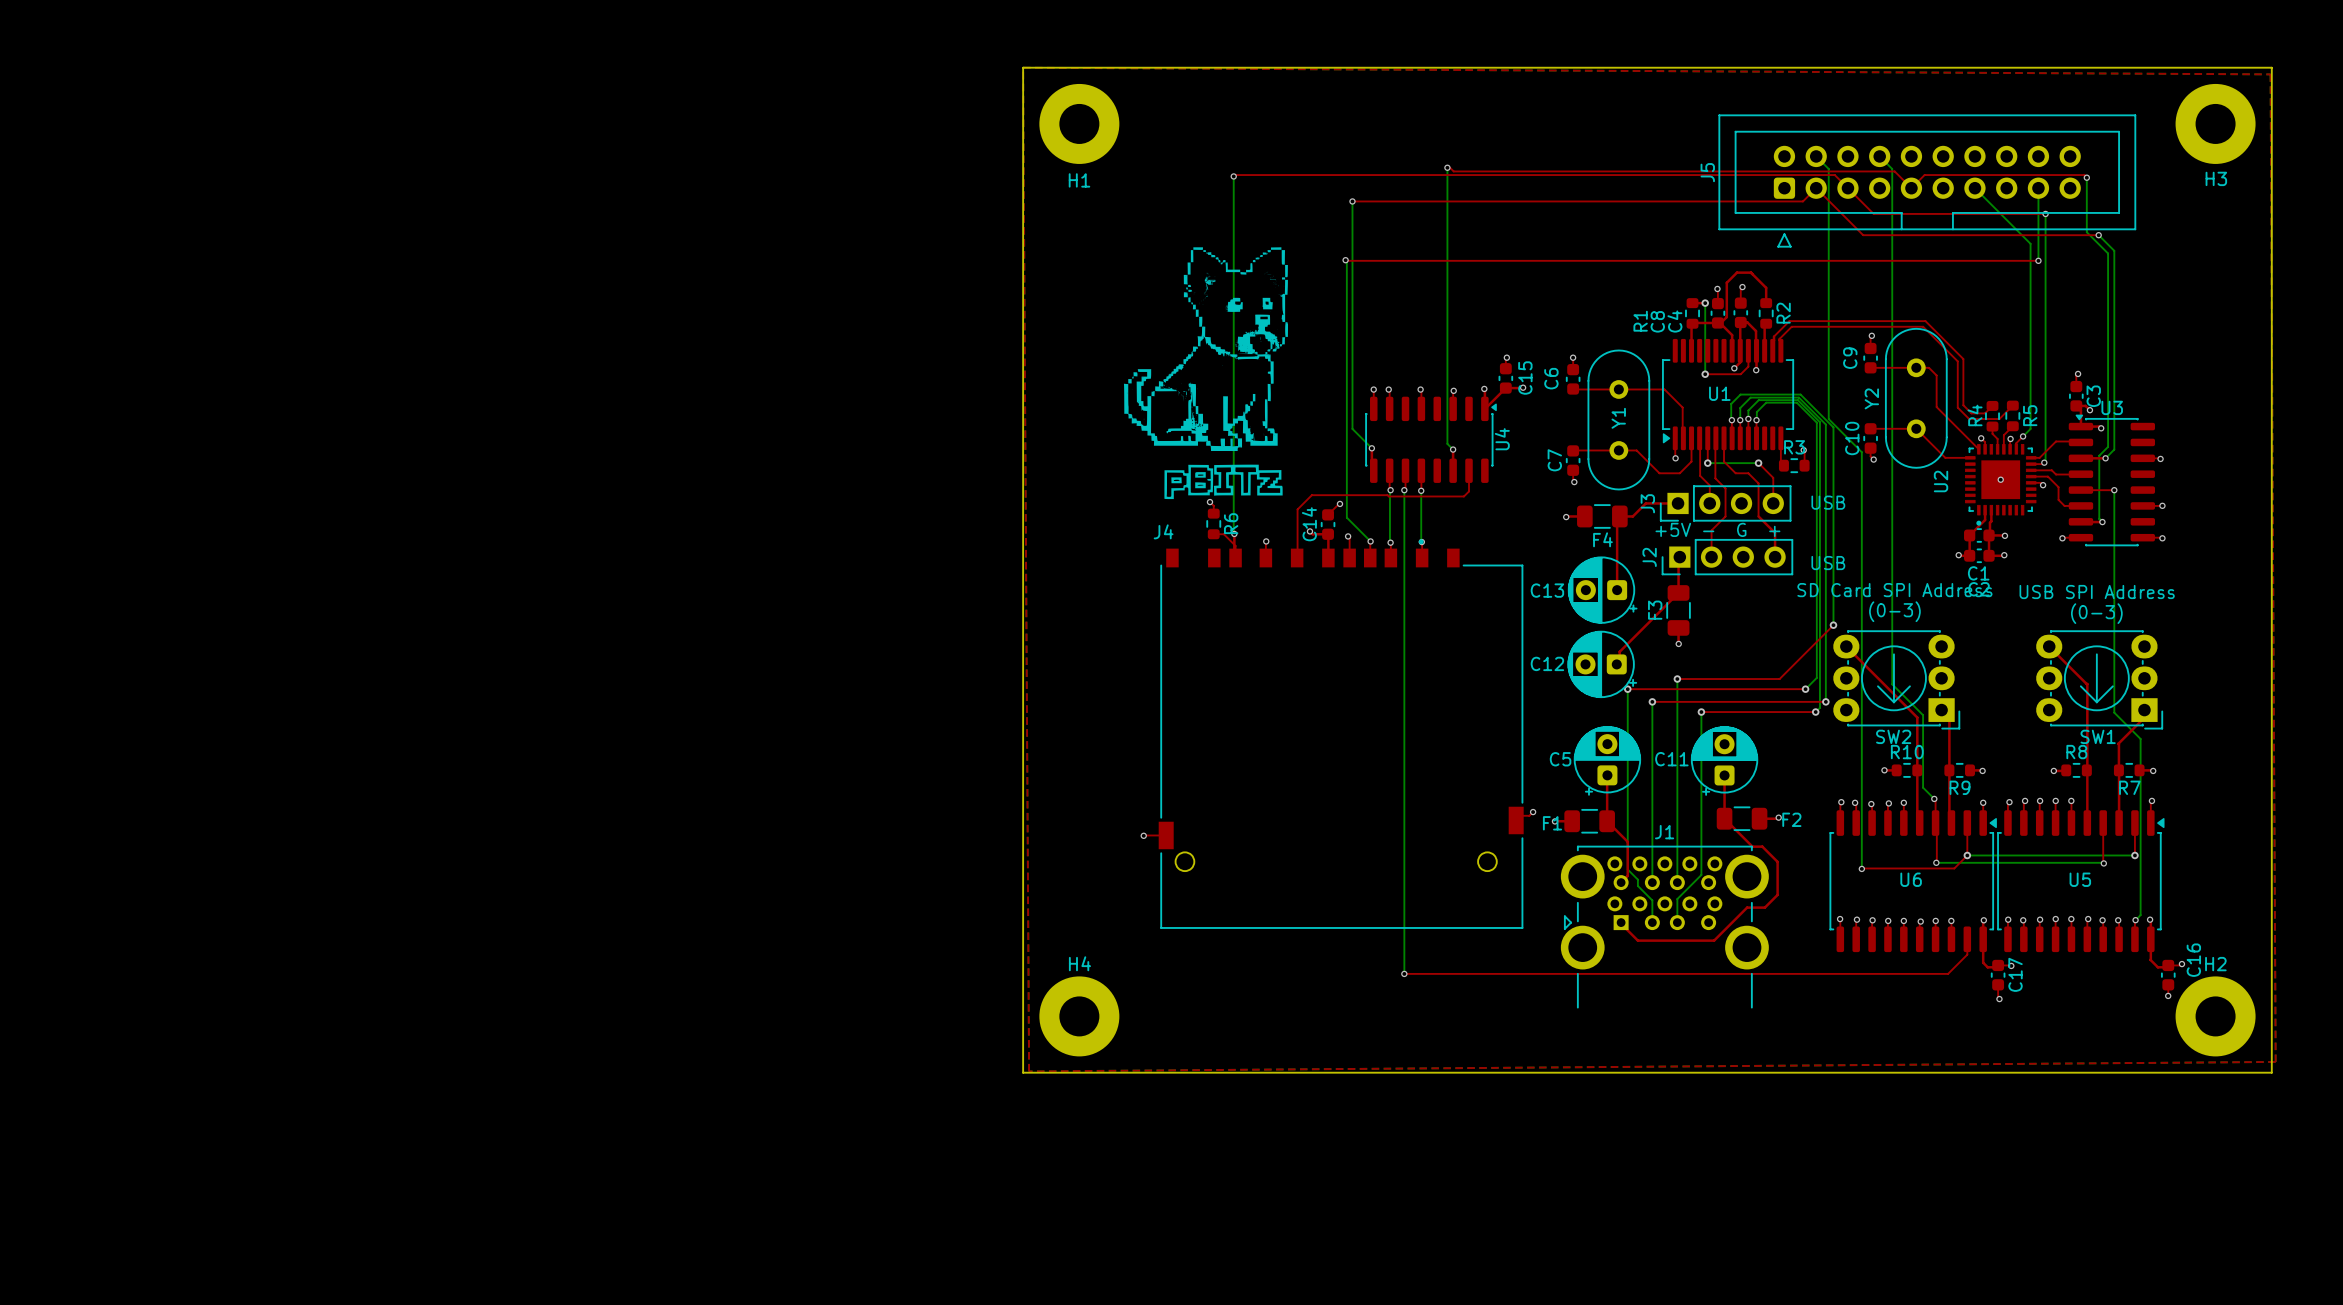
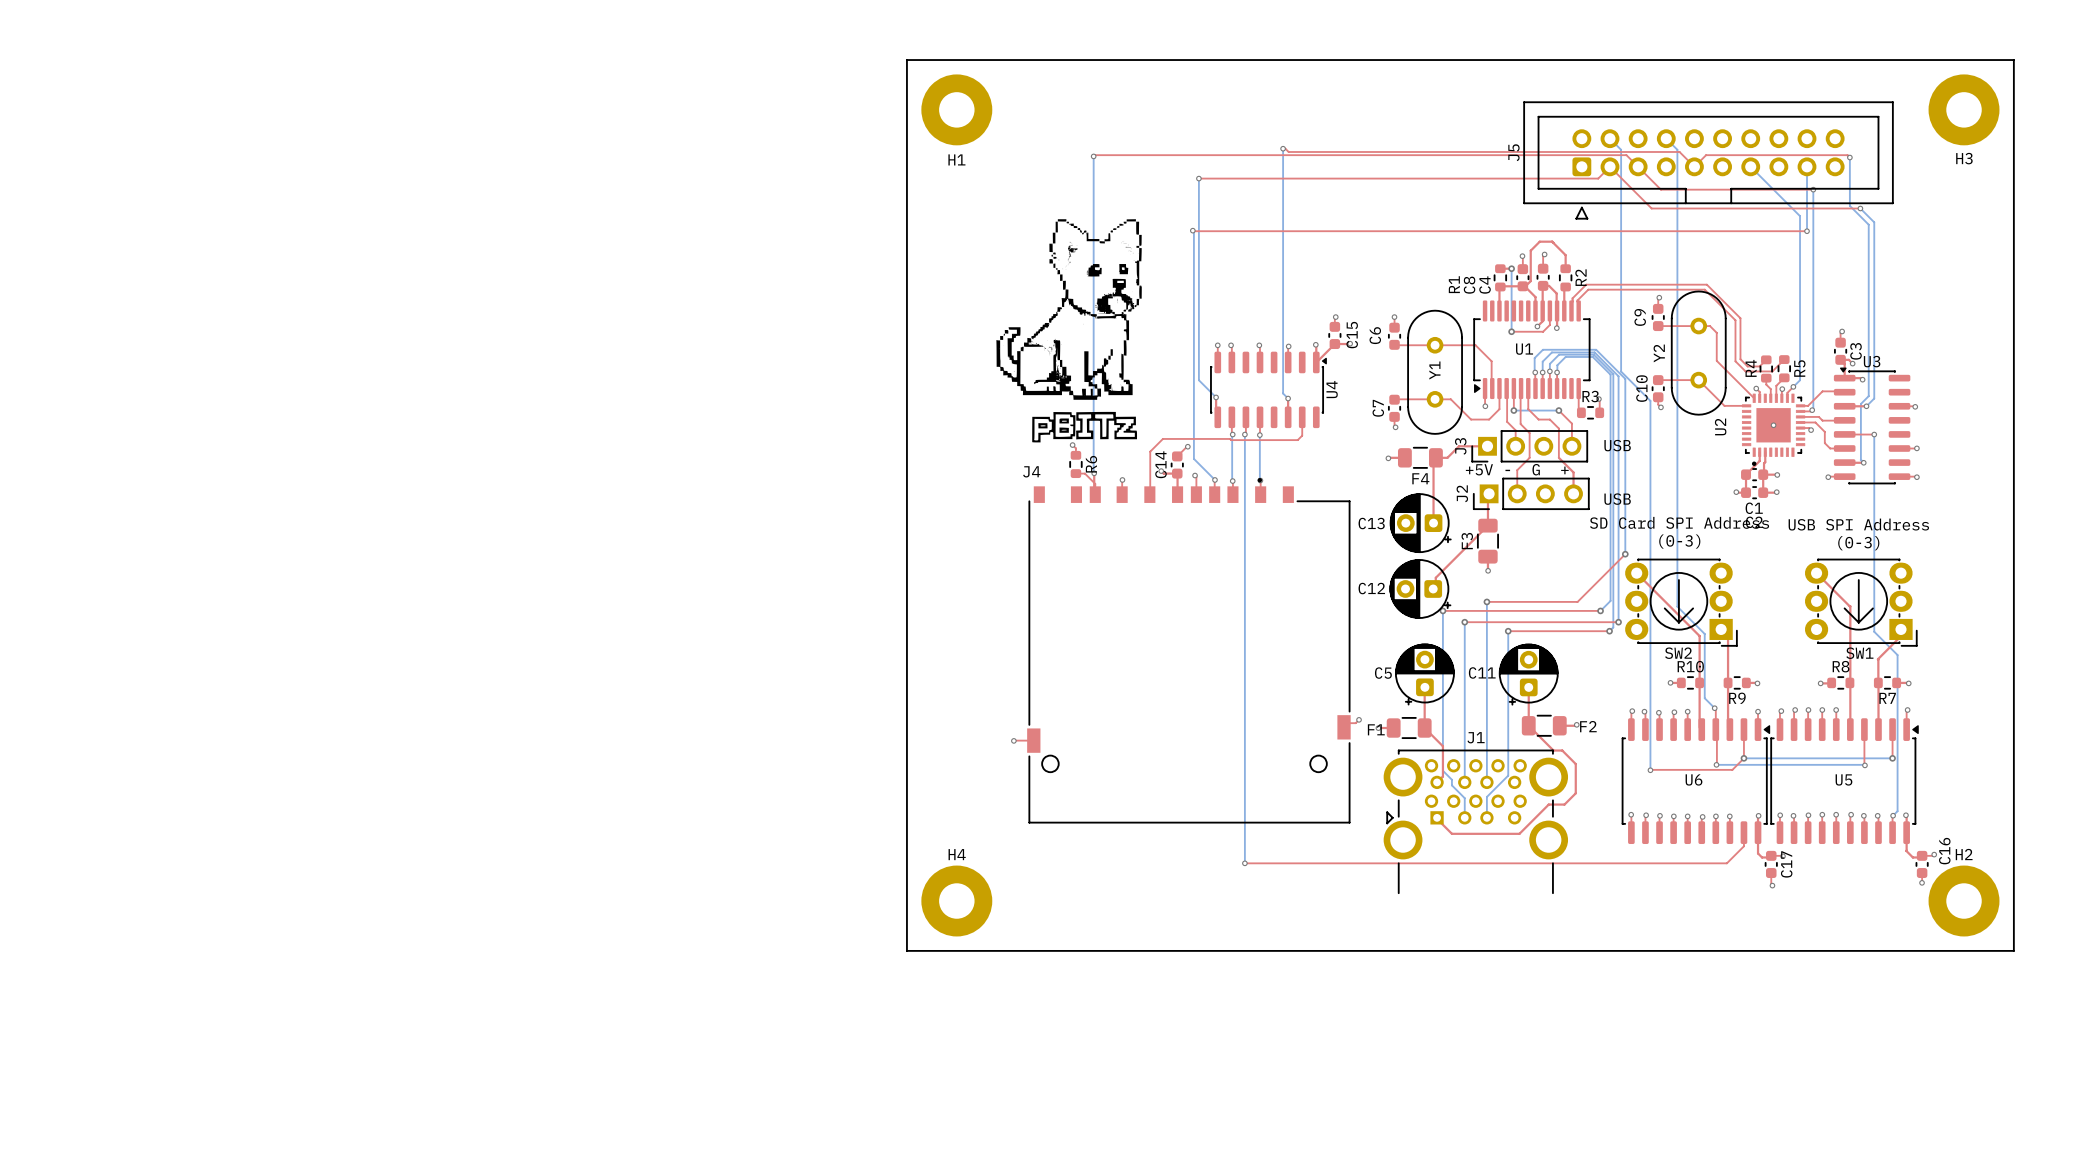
top zone outline: (1023, 67) (2270, 74) (2275, 1061) (1029, 1071) (1023, 67) -> none

